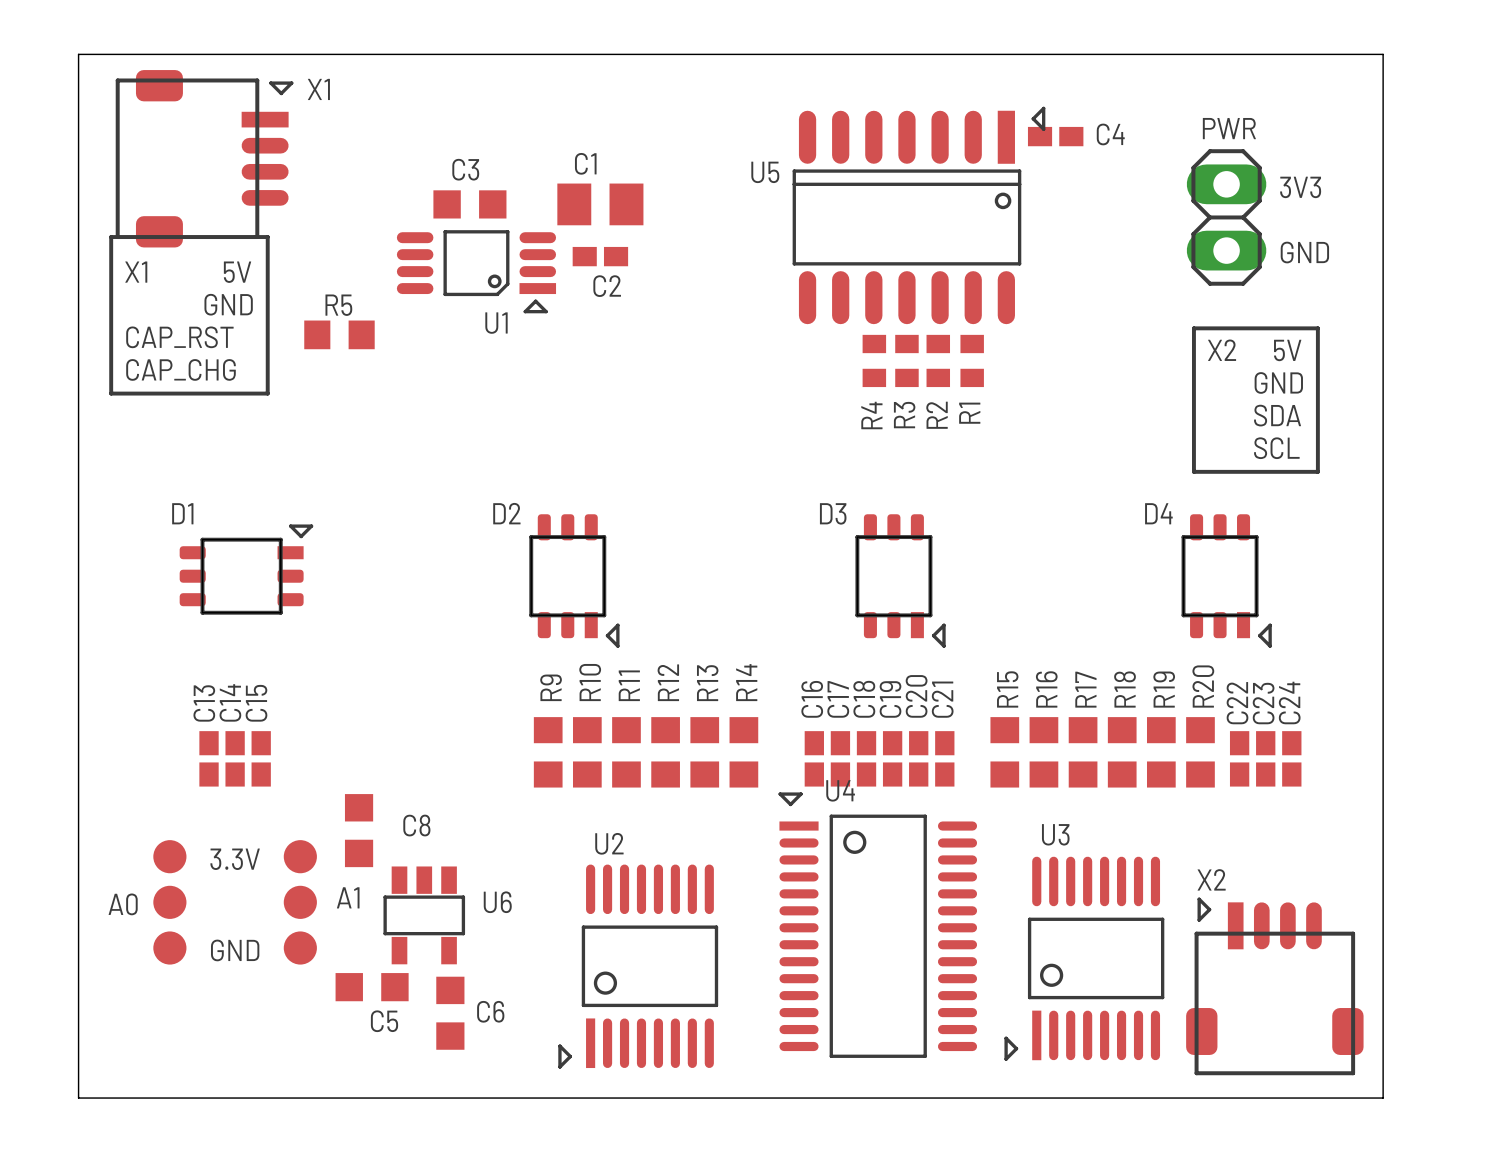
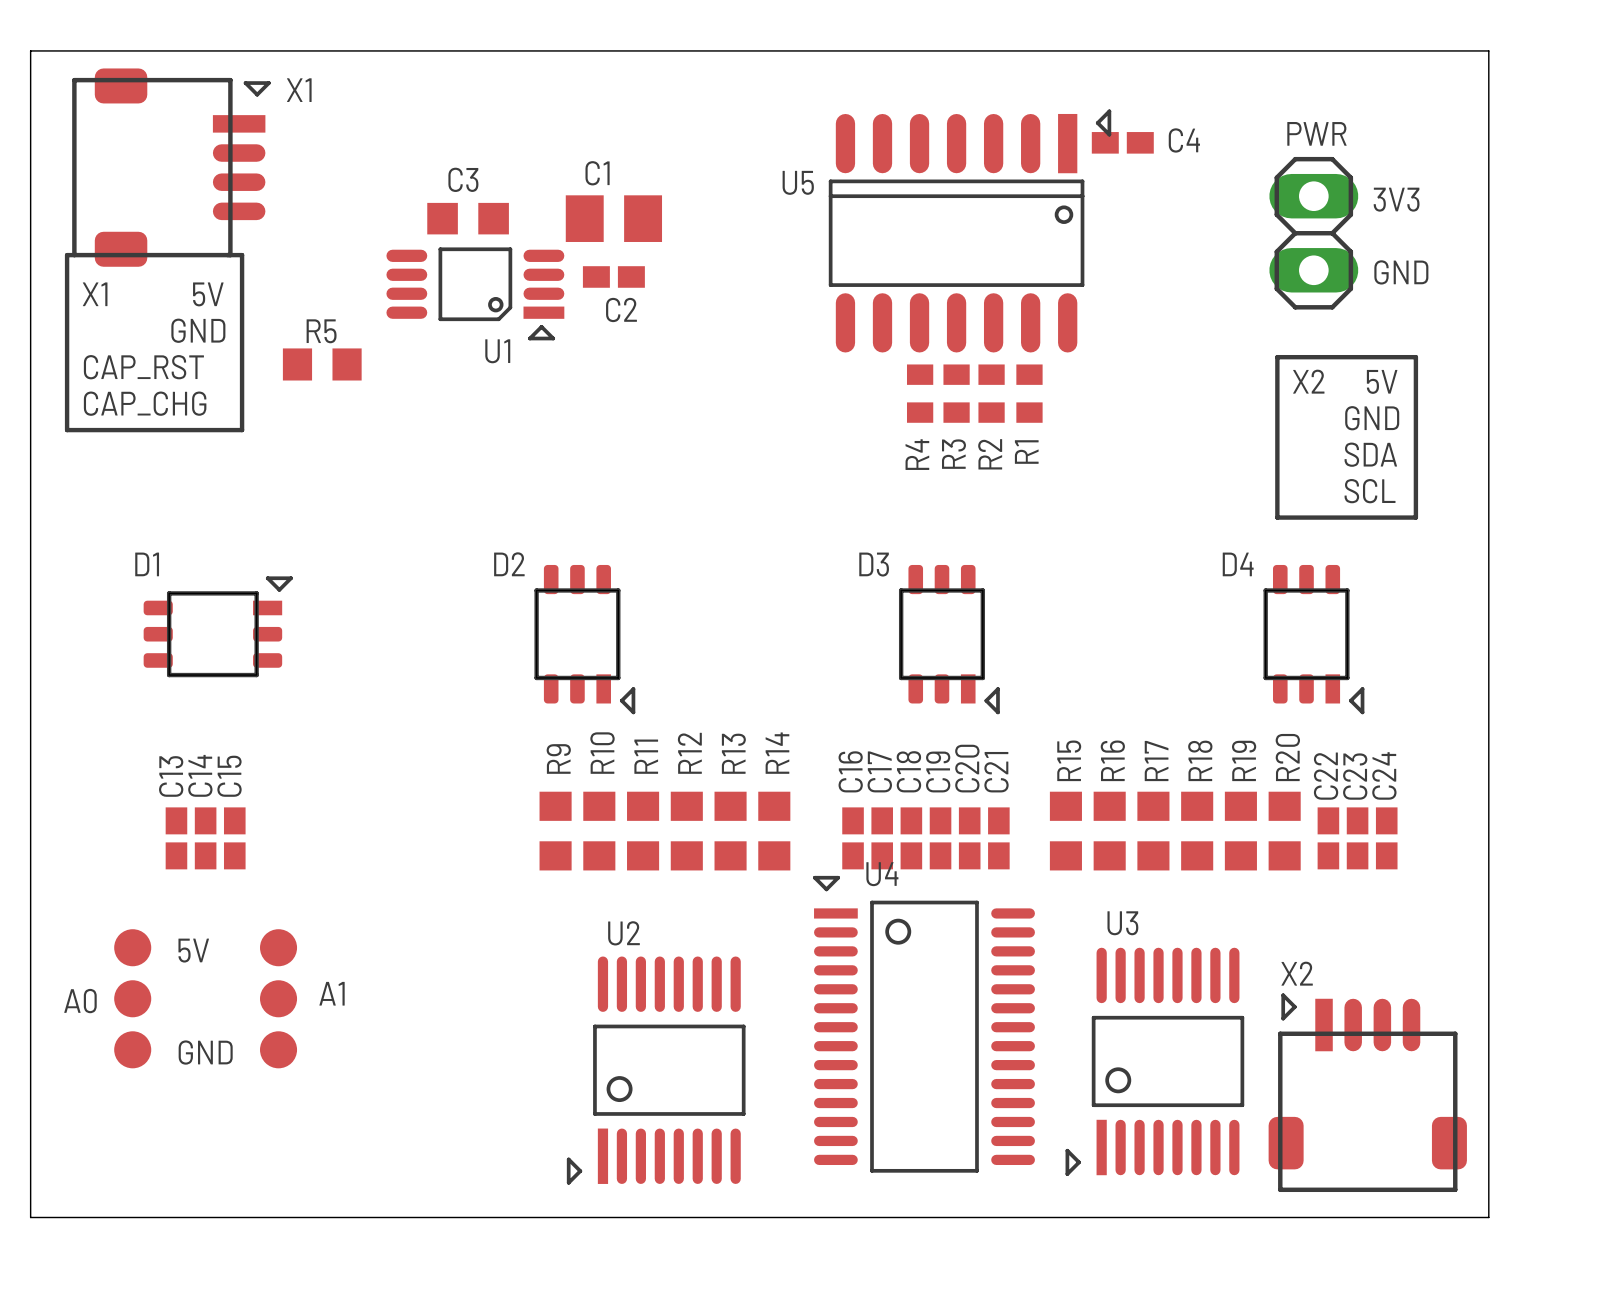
C8: (359, 830) -> none
3.3V name: 3.3V (235, 859) -> 5V (193, 950)
U6: (424, 915) -> none
C5: (372, 987) -> none
C6: (450, 1013) -> none

